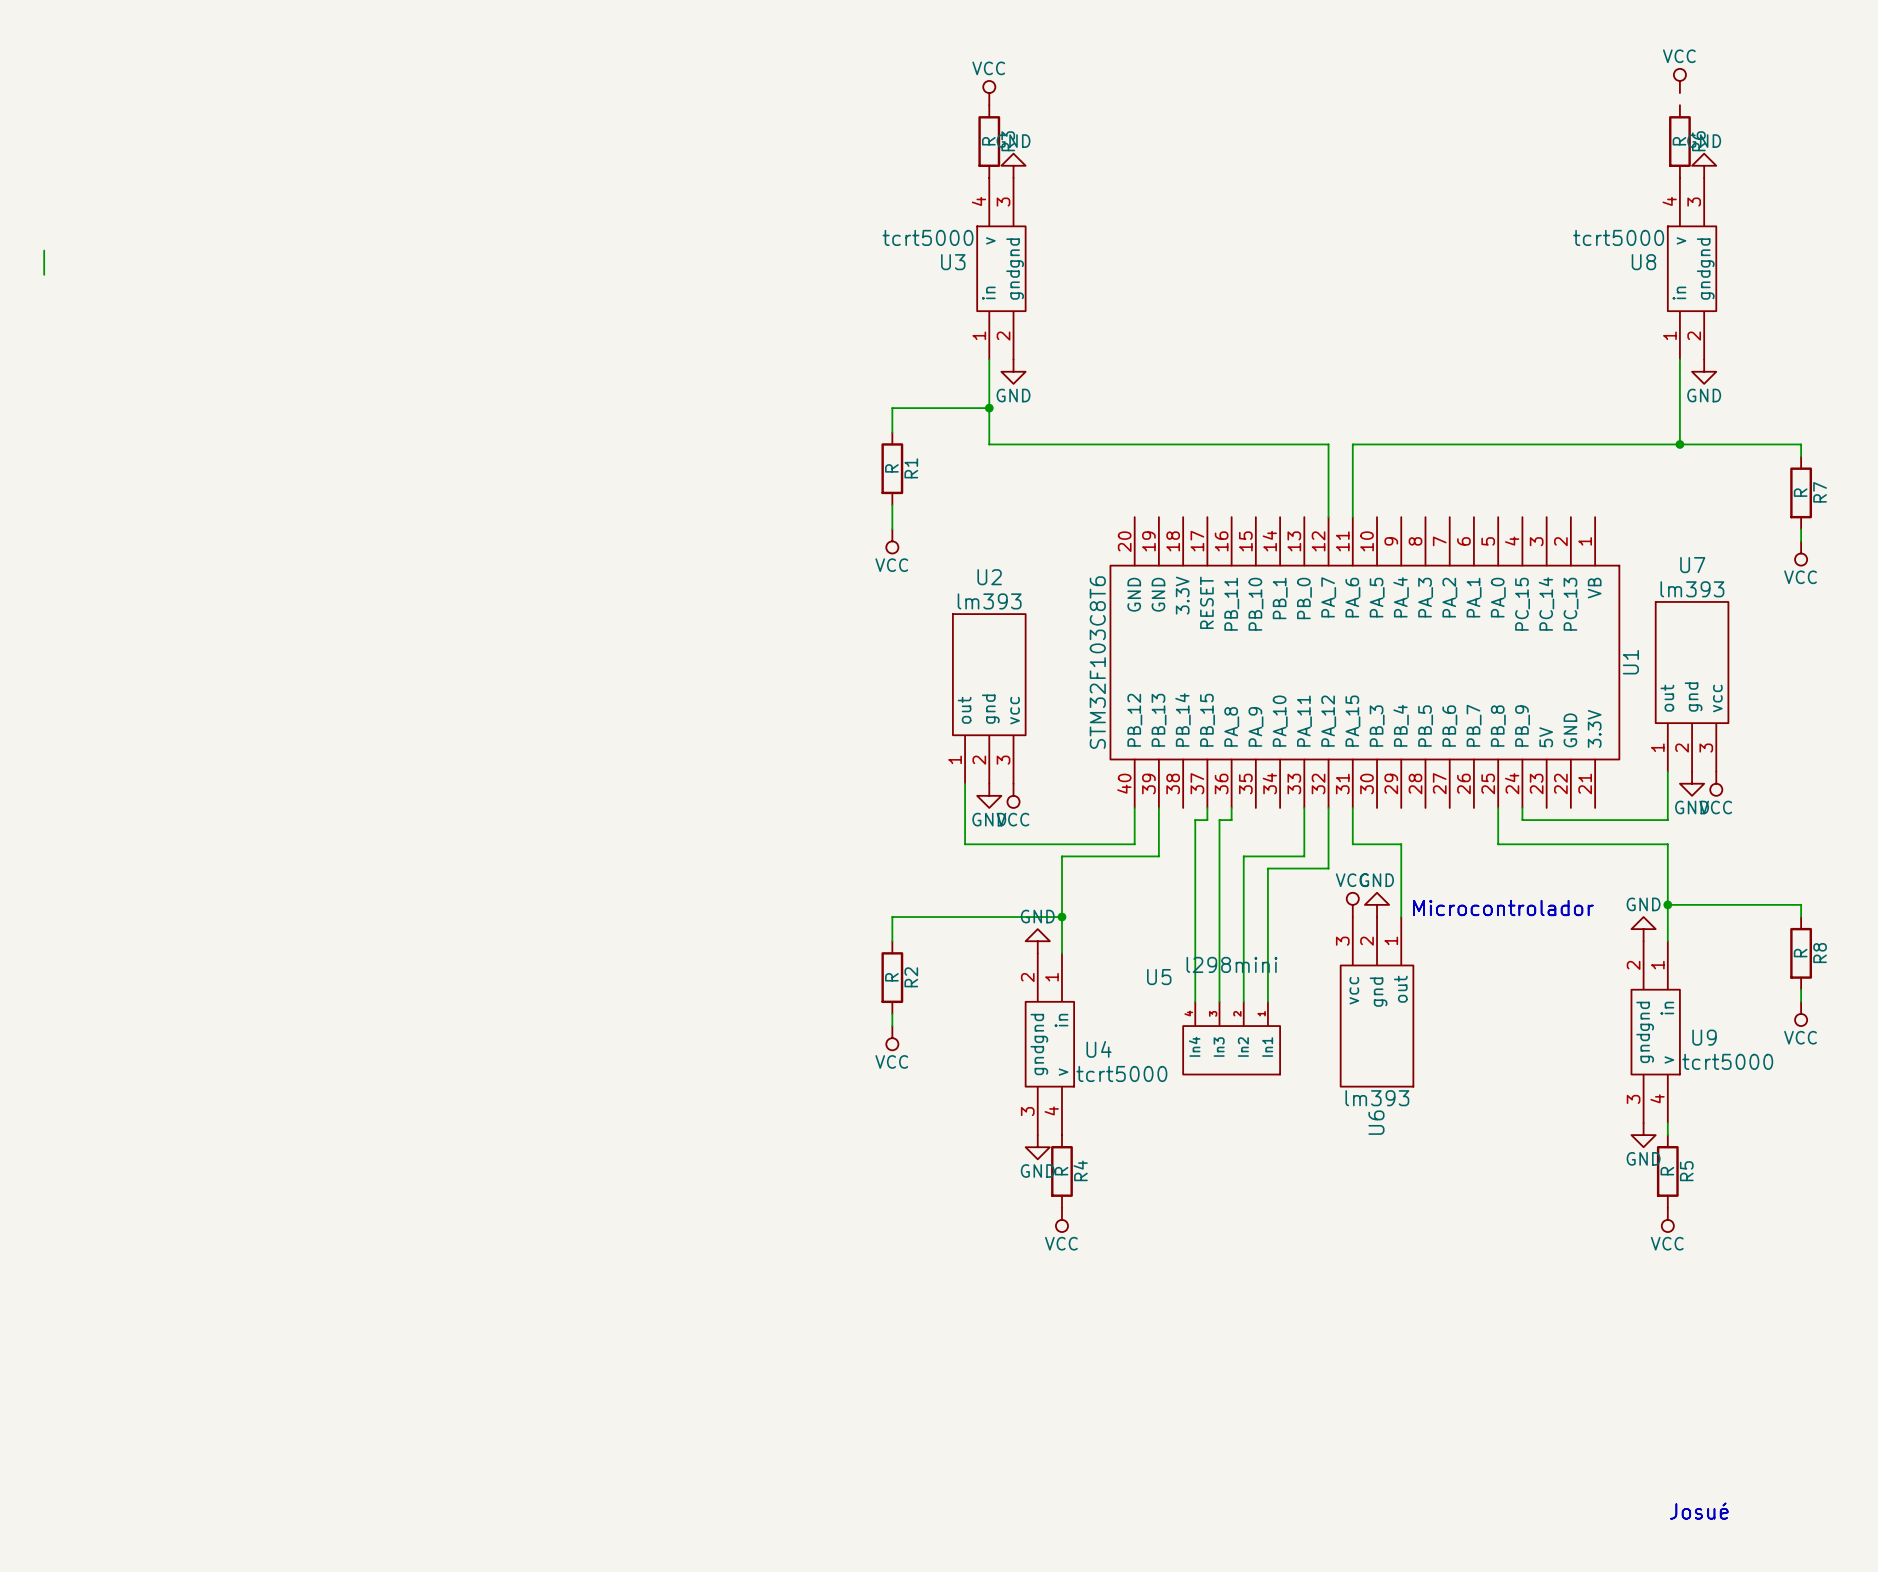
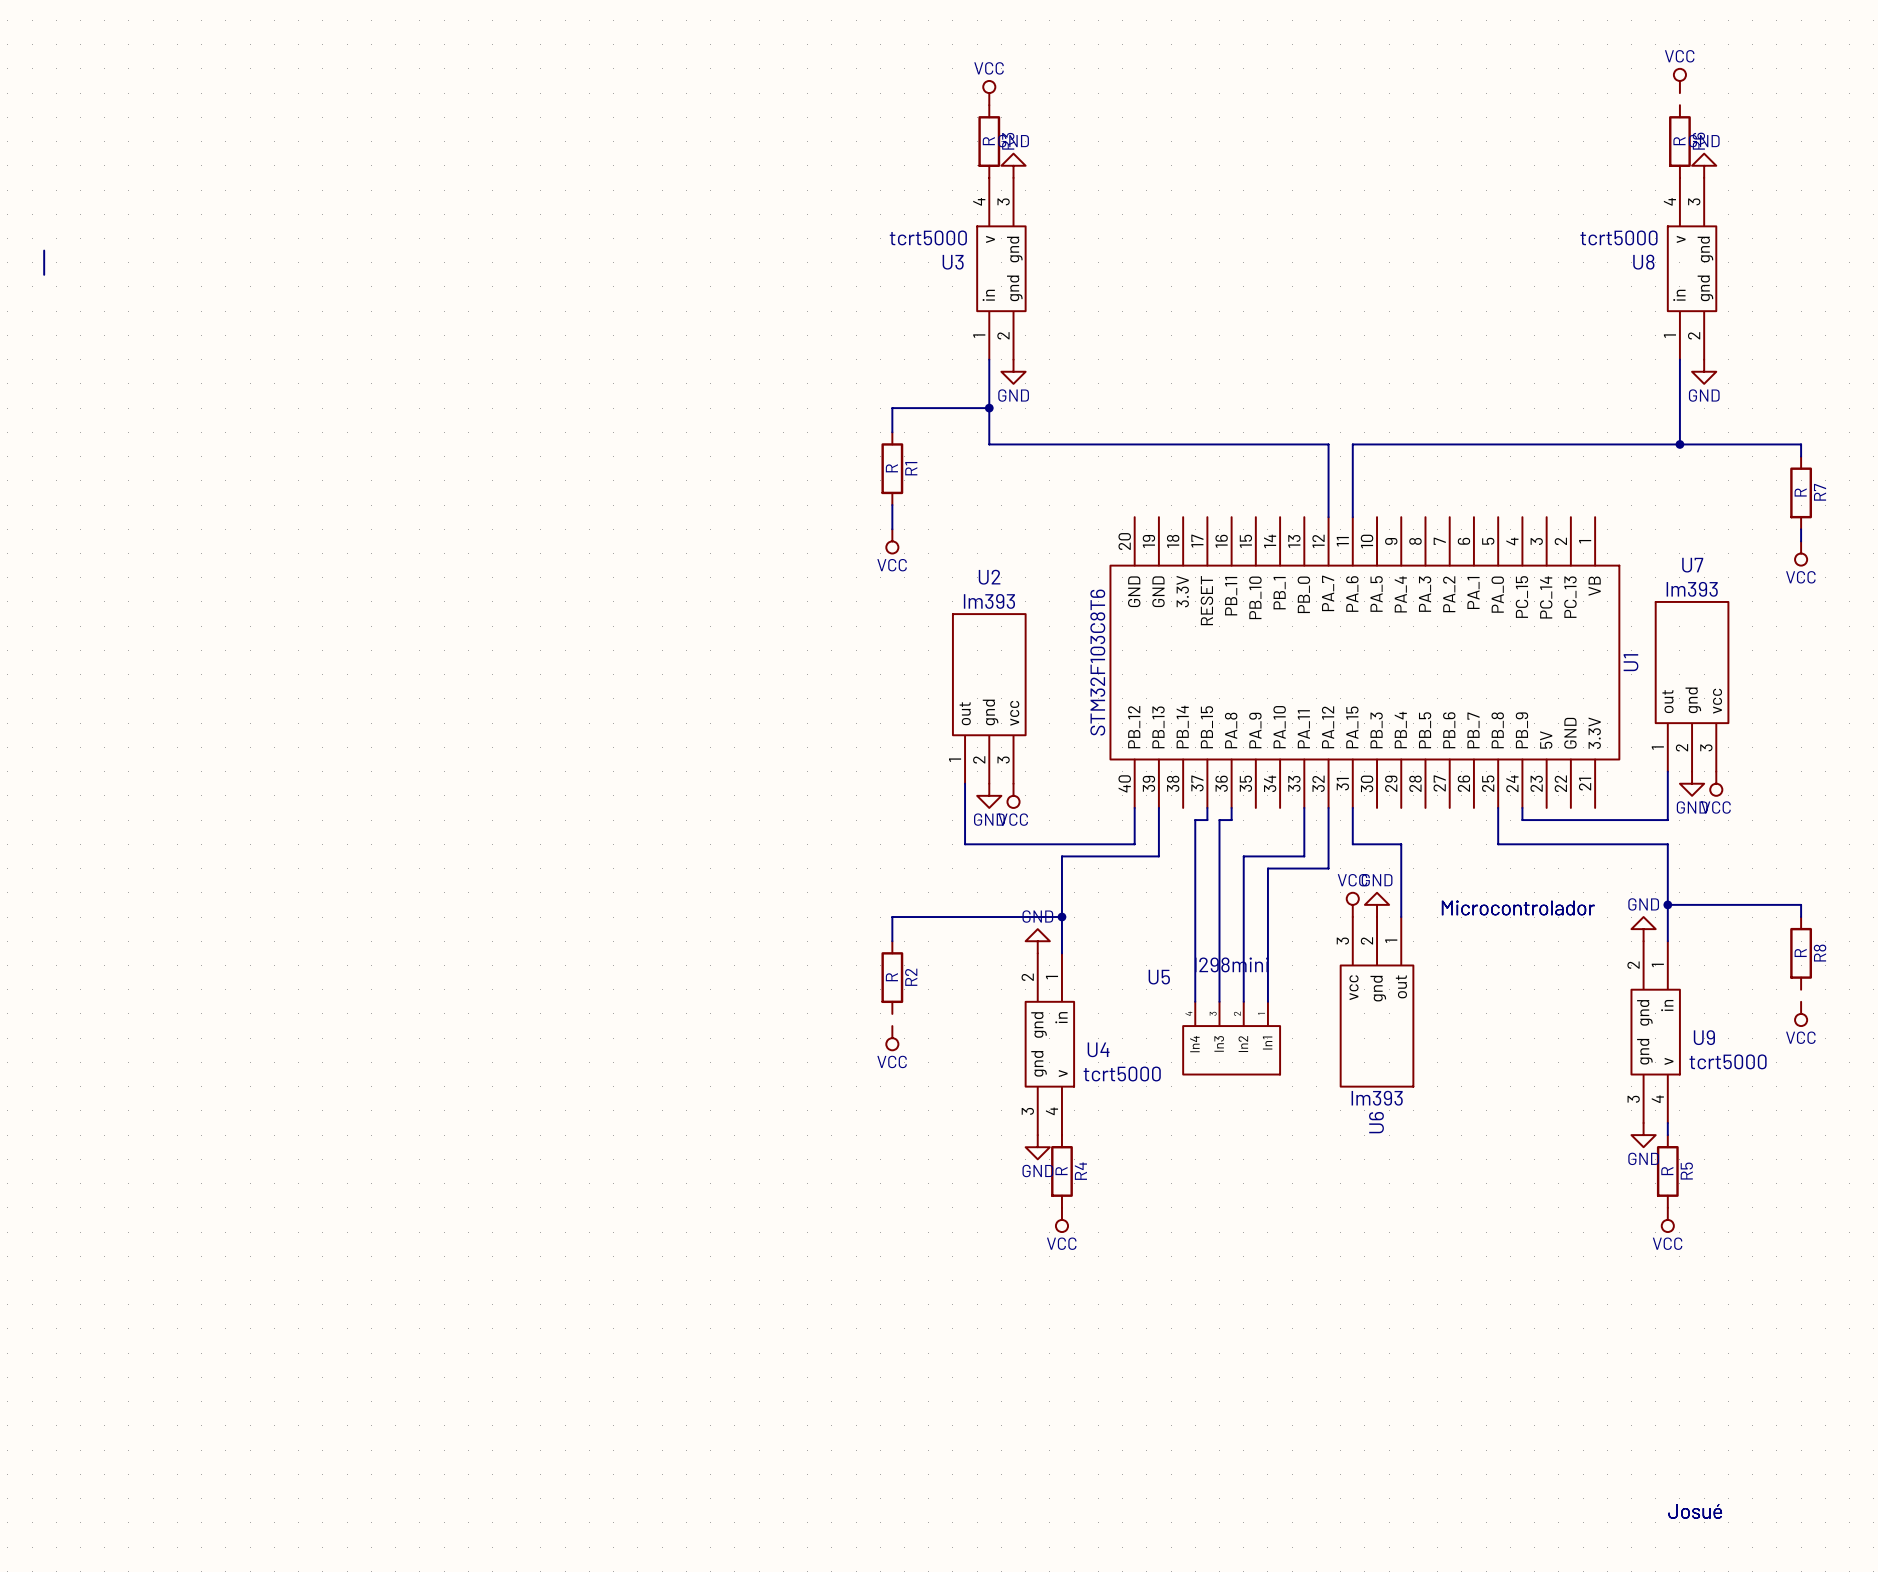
wire: (1801, 989) (1801, 1001) -> none
wire: (892, 1013) (892, 1026) -> none

